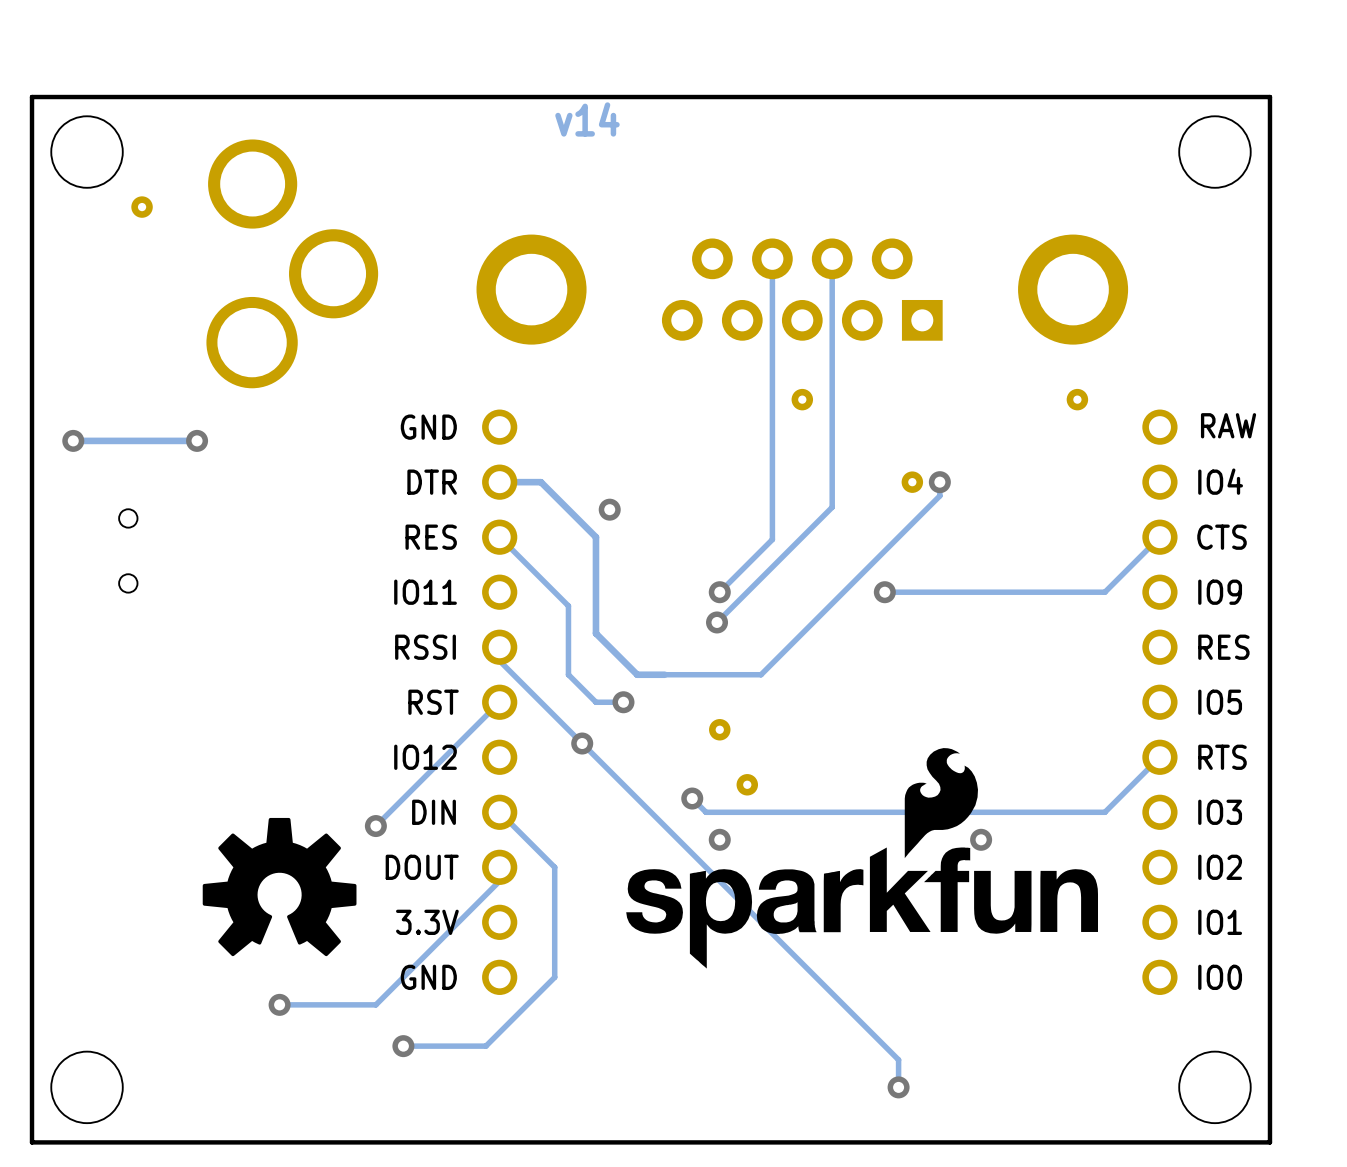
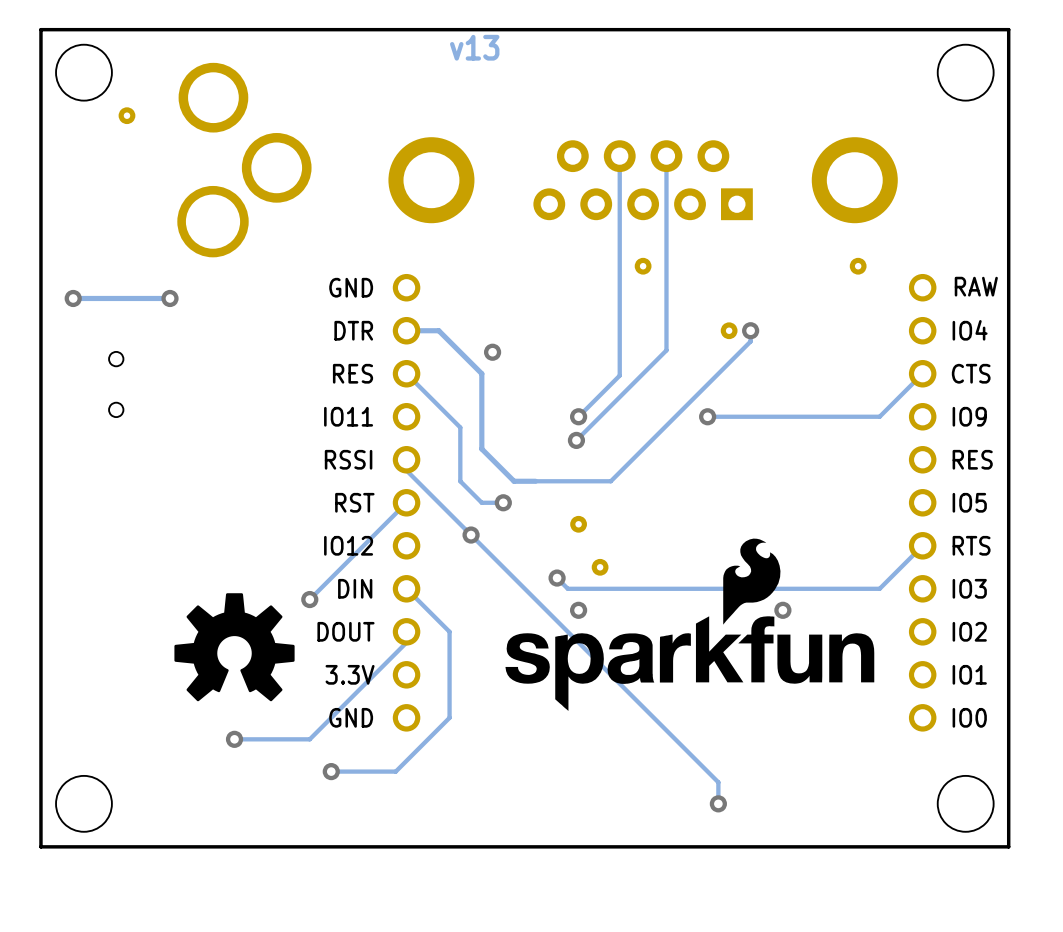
text: v14 (587, 119) -> v13 (474, 47)

